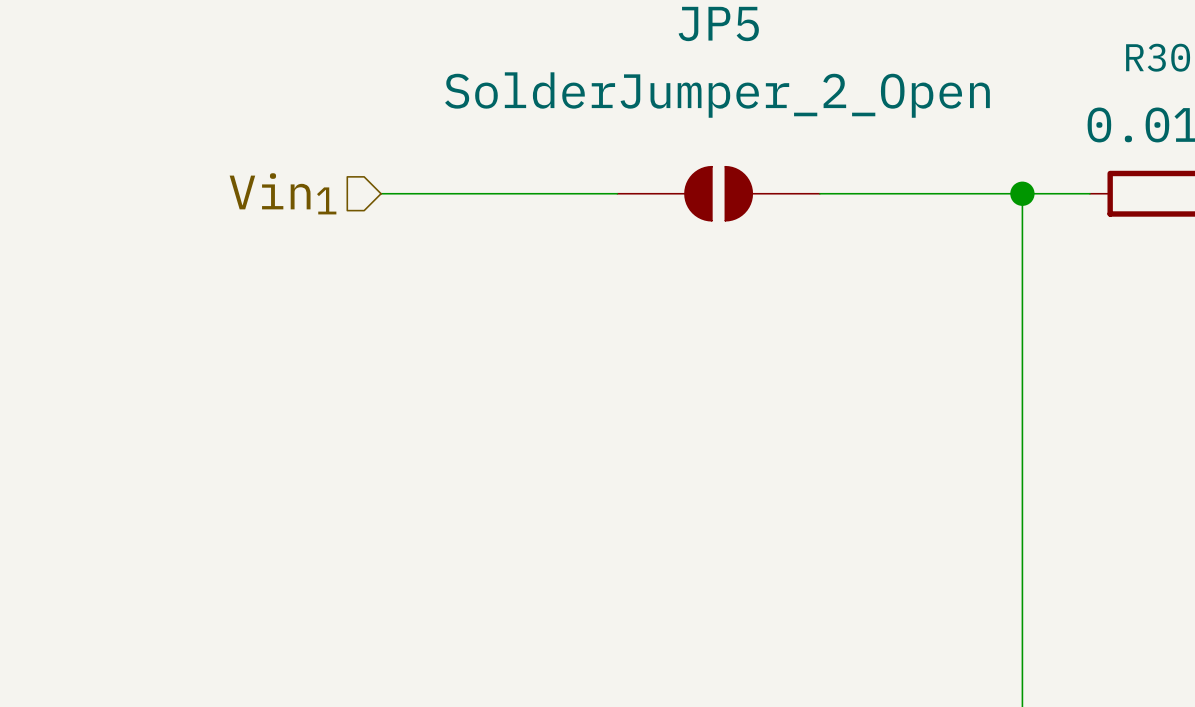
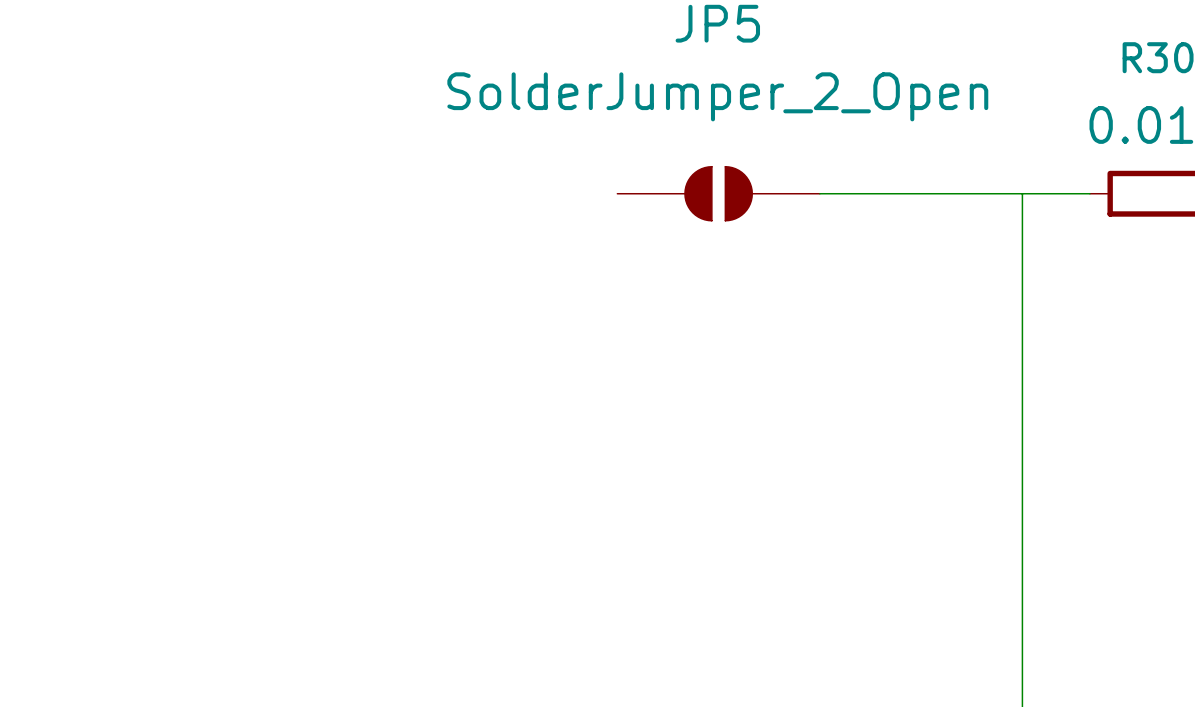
hierarchical label: Vin1 (283, 193) -> none
wire: (381, 193) (617, 193) -> none
junction: (1022, 193) -> none

